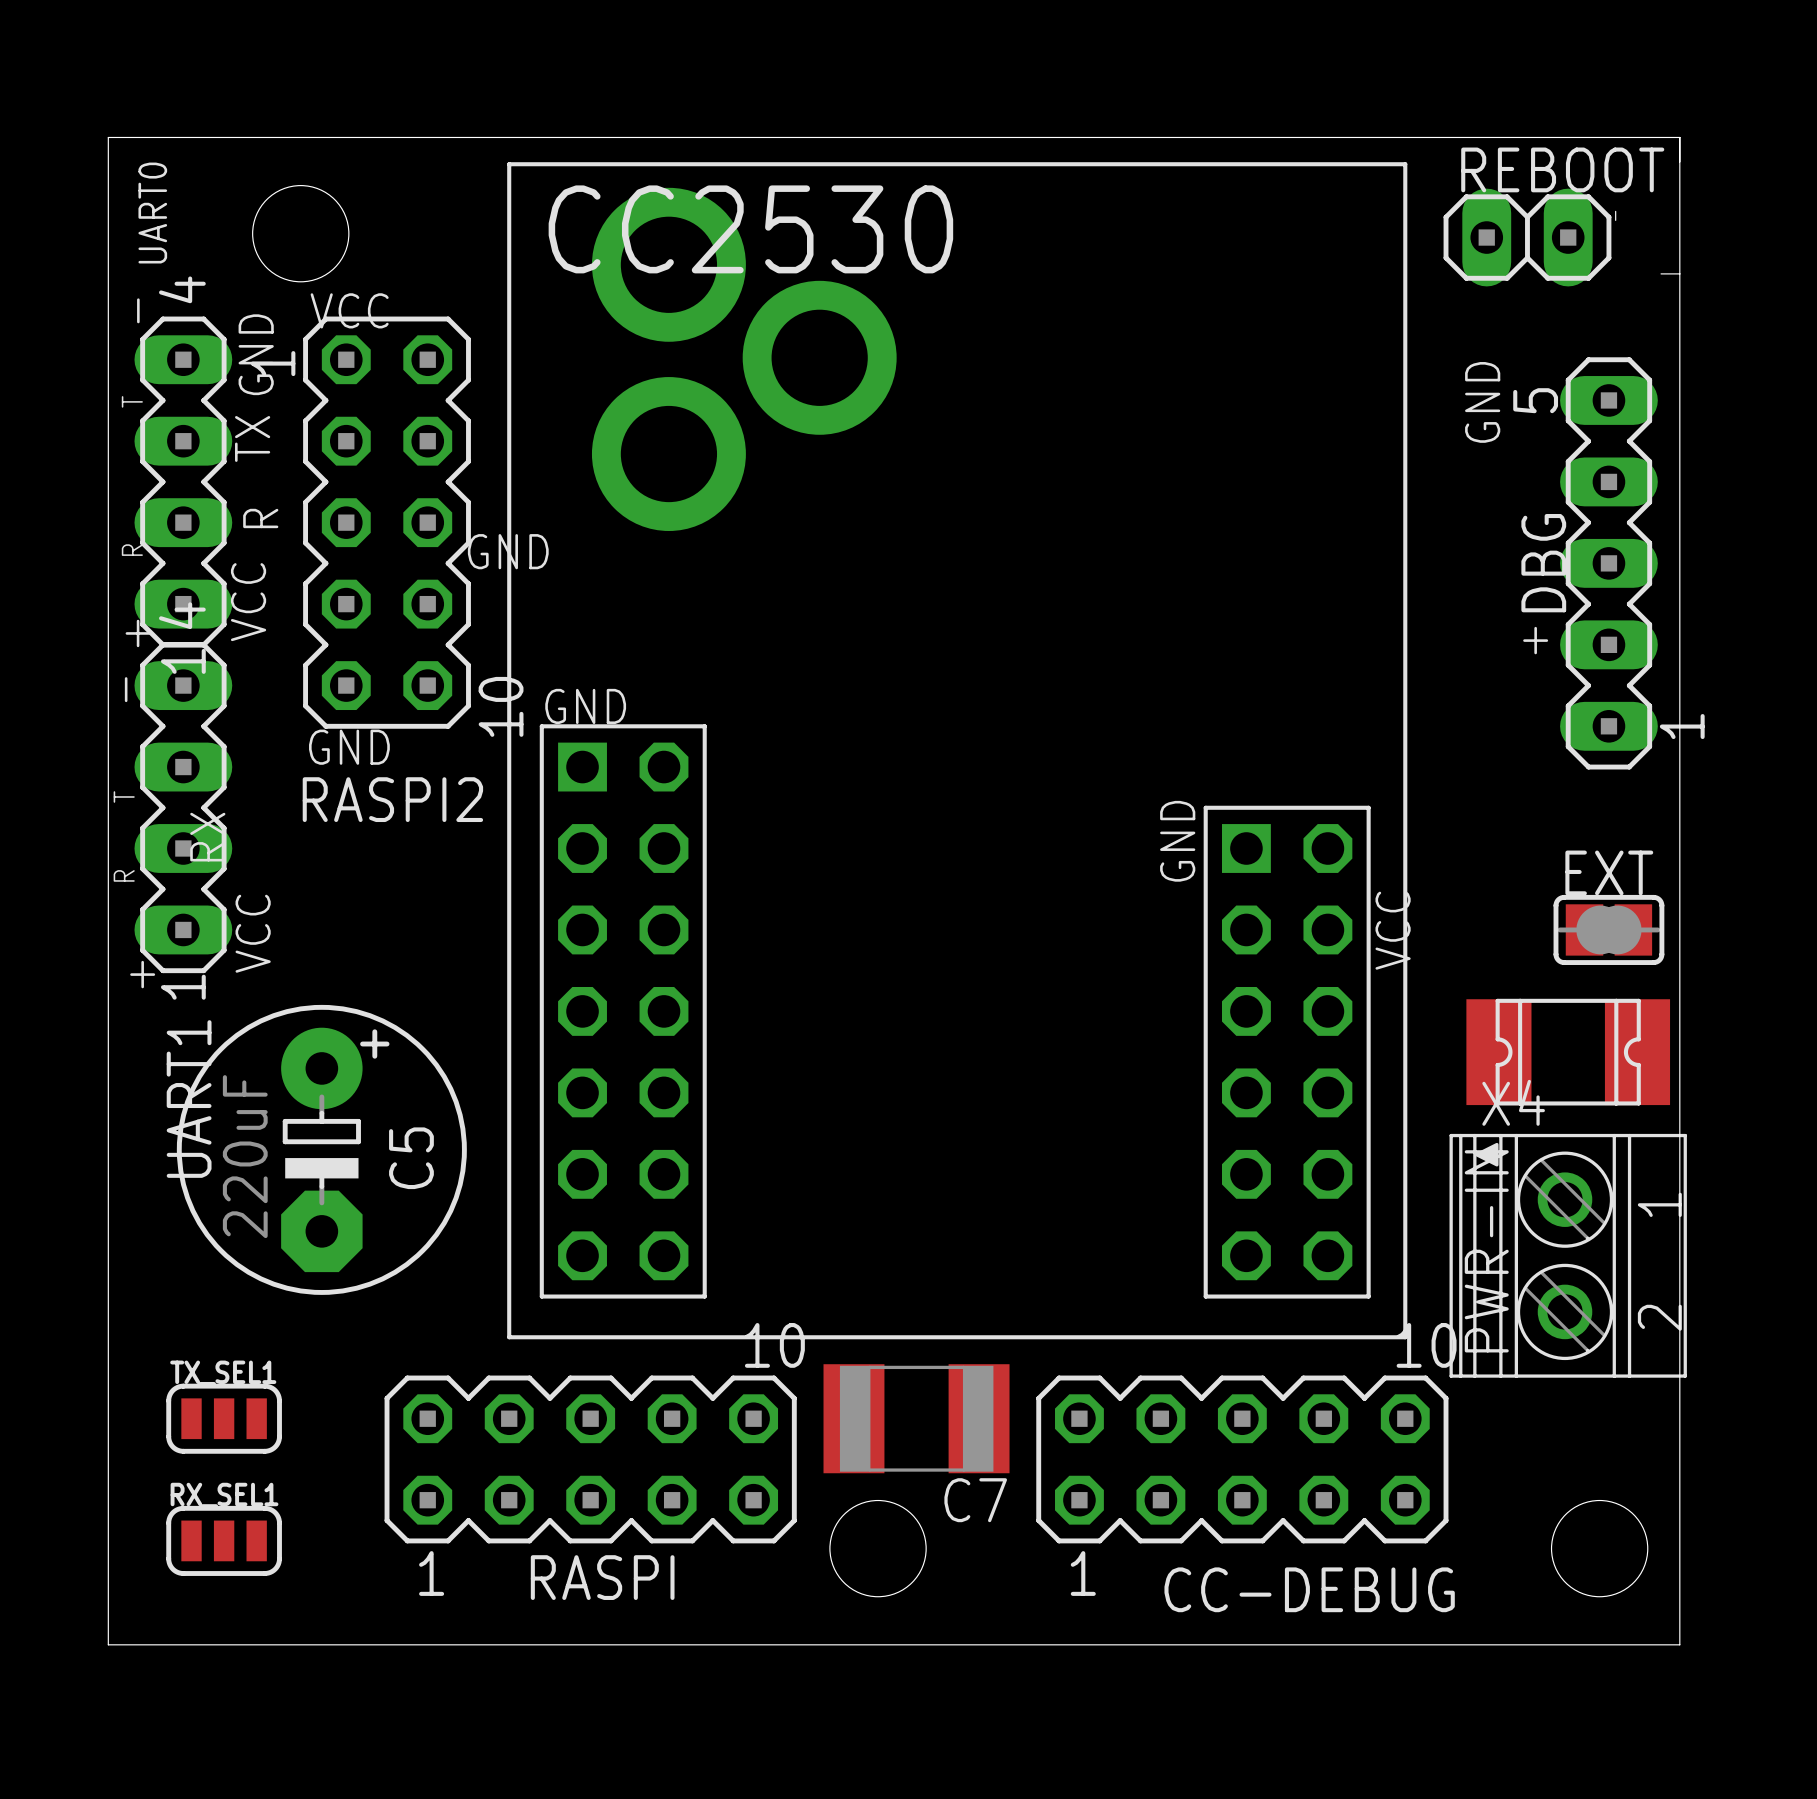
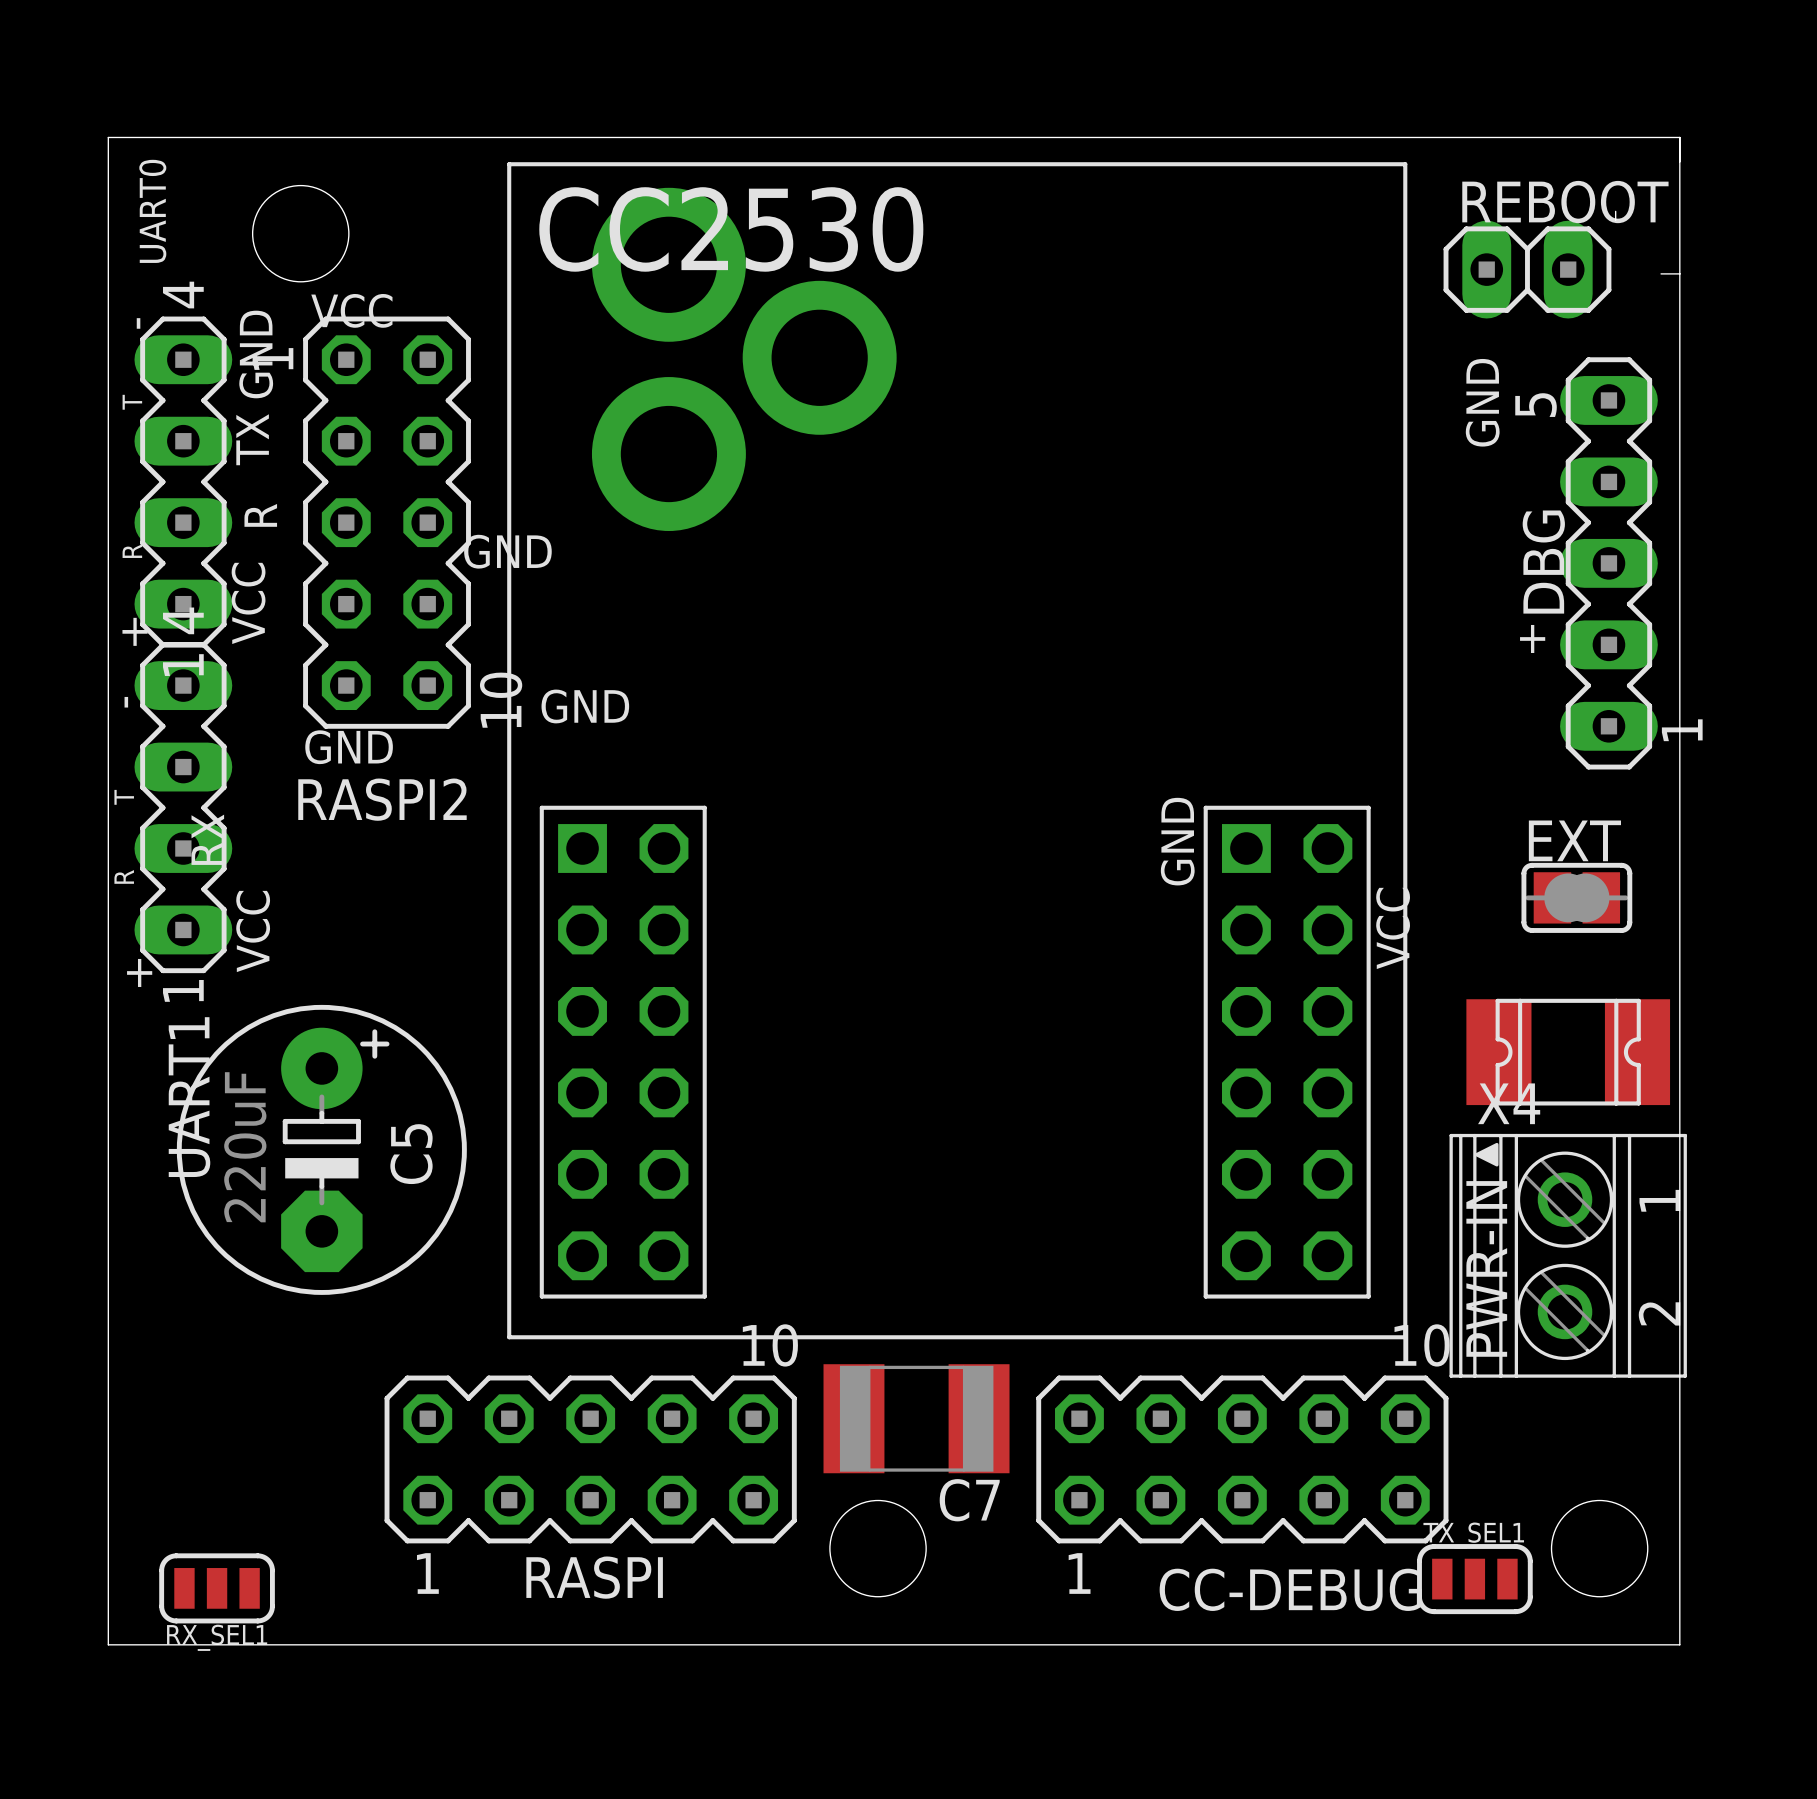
part footprint: [507, 162, 1408, 1340] -> [507, 162, 1408, 1340]
REBOOT position: (1527, 237) -> (1527, 269)
EXT position: (1608, 929) -> (1576, 897)
TX_SEL1 position: (224, 1418) -> (1474, 1579)
RX_SEL1 name position: RX_SEL1 (224, 1495) -> RX_SEL1 (217, 1637)
RX_SEL1 position: (224, 1540) -> (217, 1588)

